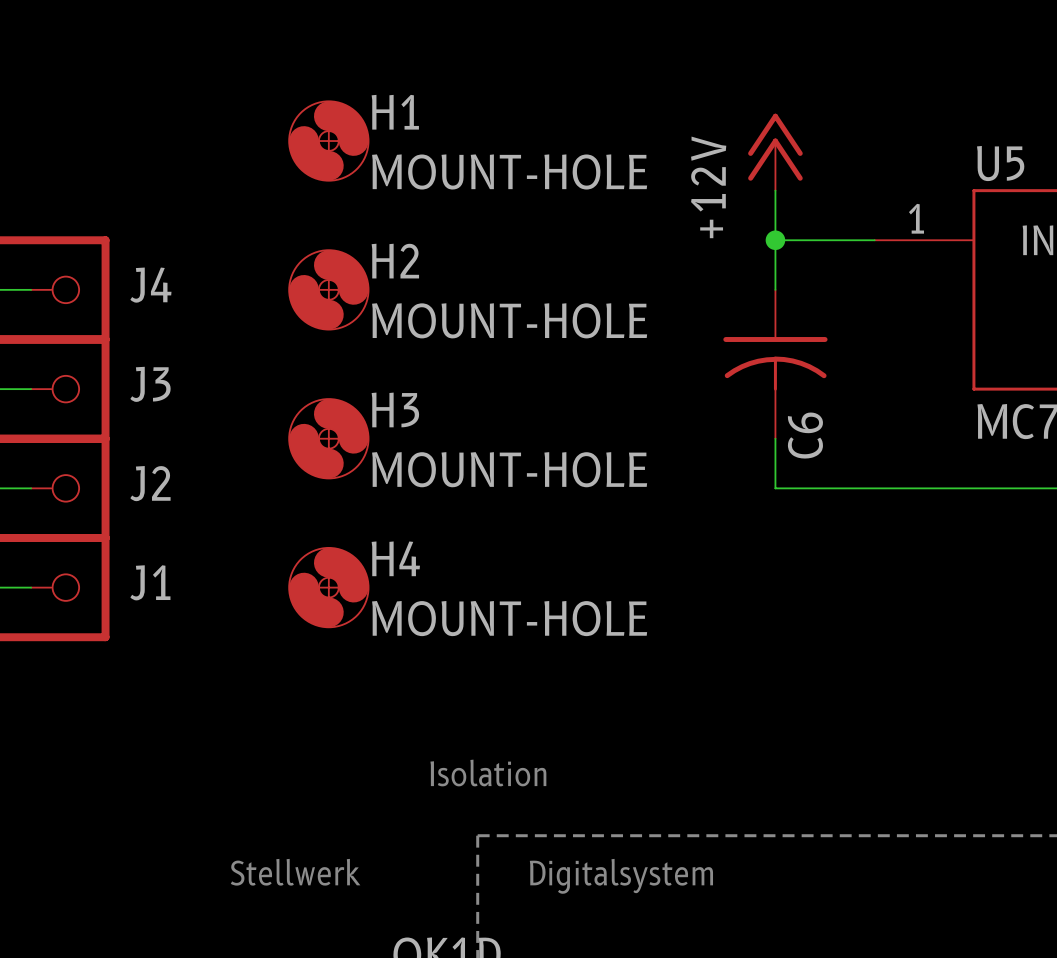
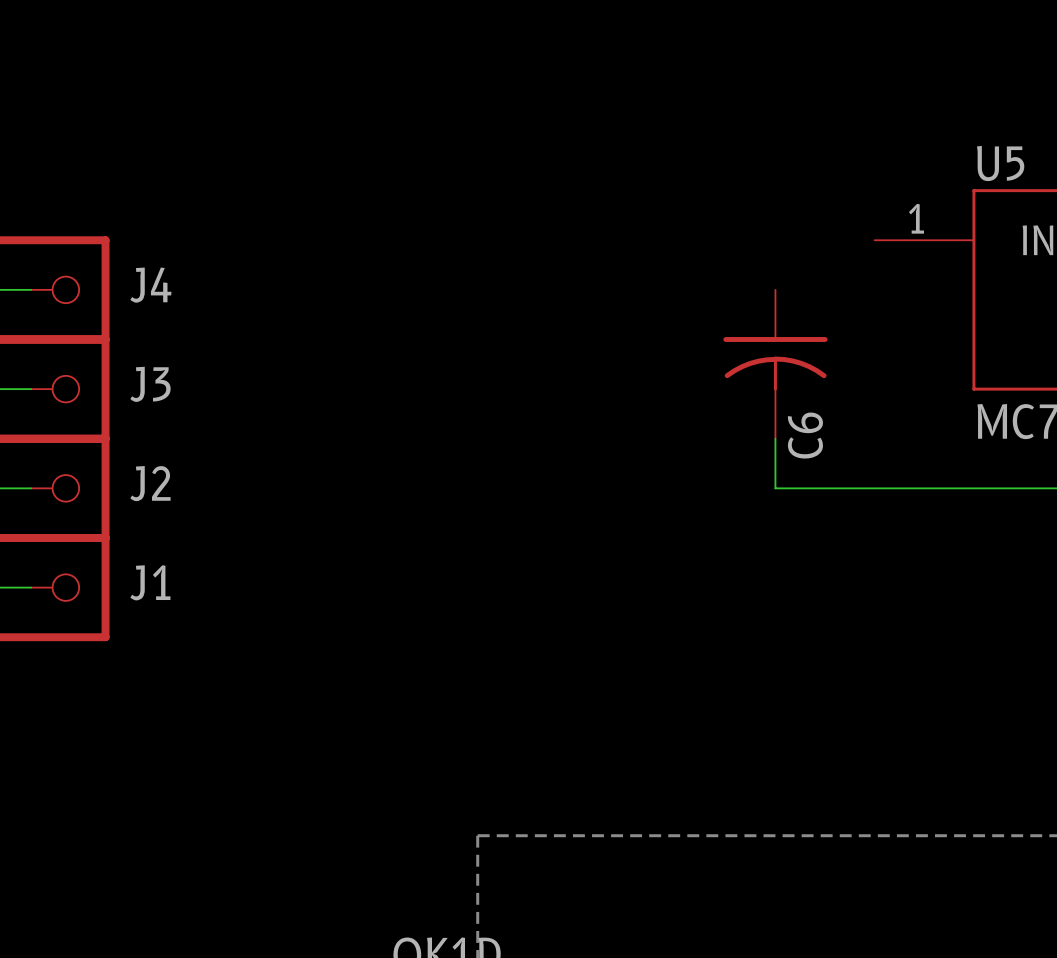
H1: MOUNT-HOLE (328, 141) -> none
power symbol: +12V (775, 152) -> none
wire: (775, 190) (775, 289) -> none
wire: (775, 240) (874, 240) -> none
junction: (775, 240) -> none
H2: MOUNT-HOLE (328, 289) -> none
H3: MOUNT-HOLE (328, 438) -> none
H4: MOUNT-HOLE (328, 587) -> none
text: Isolation (488, 773) -> none
text: Stellwerk (295, 872) -> none
text: Digitalsystem (621, 876) -> none

